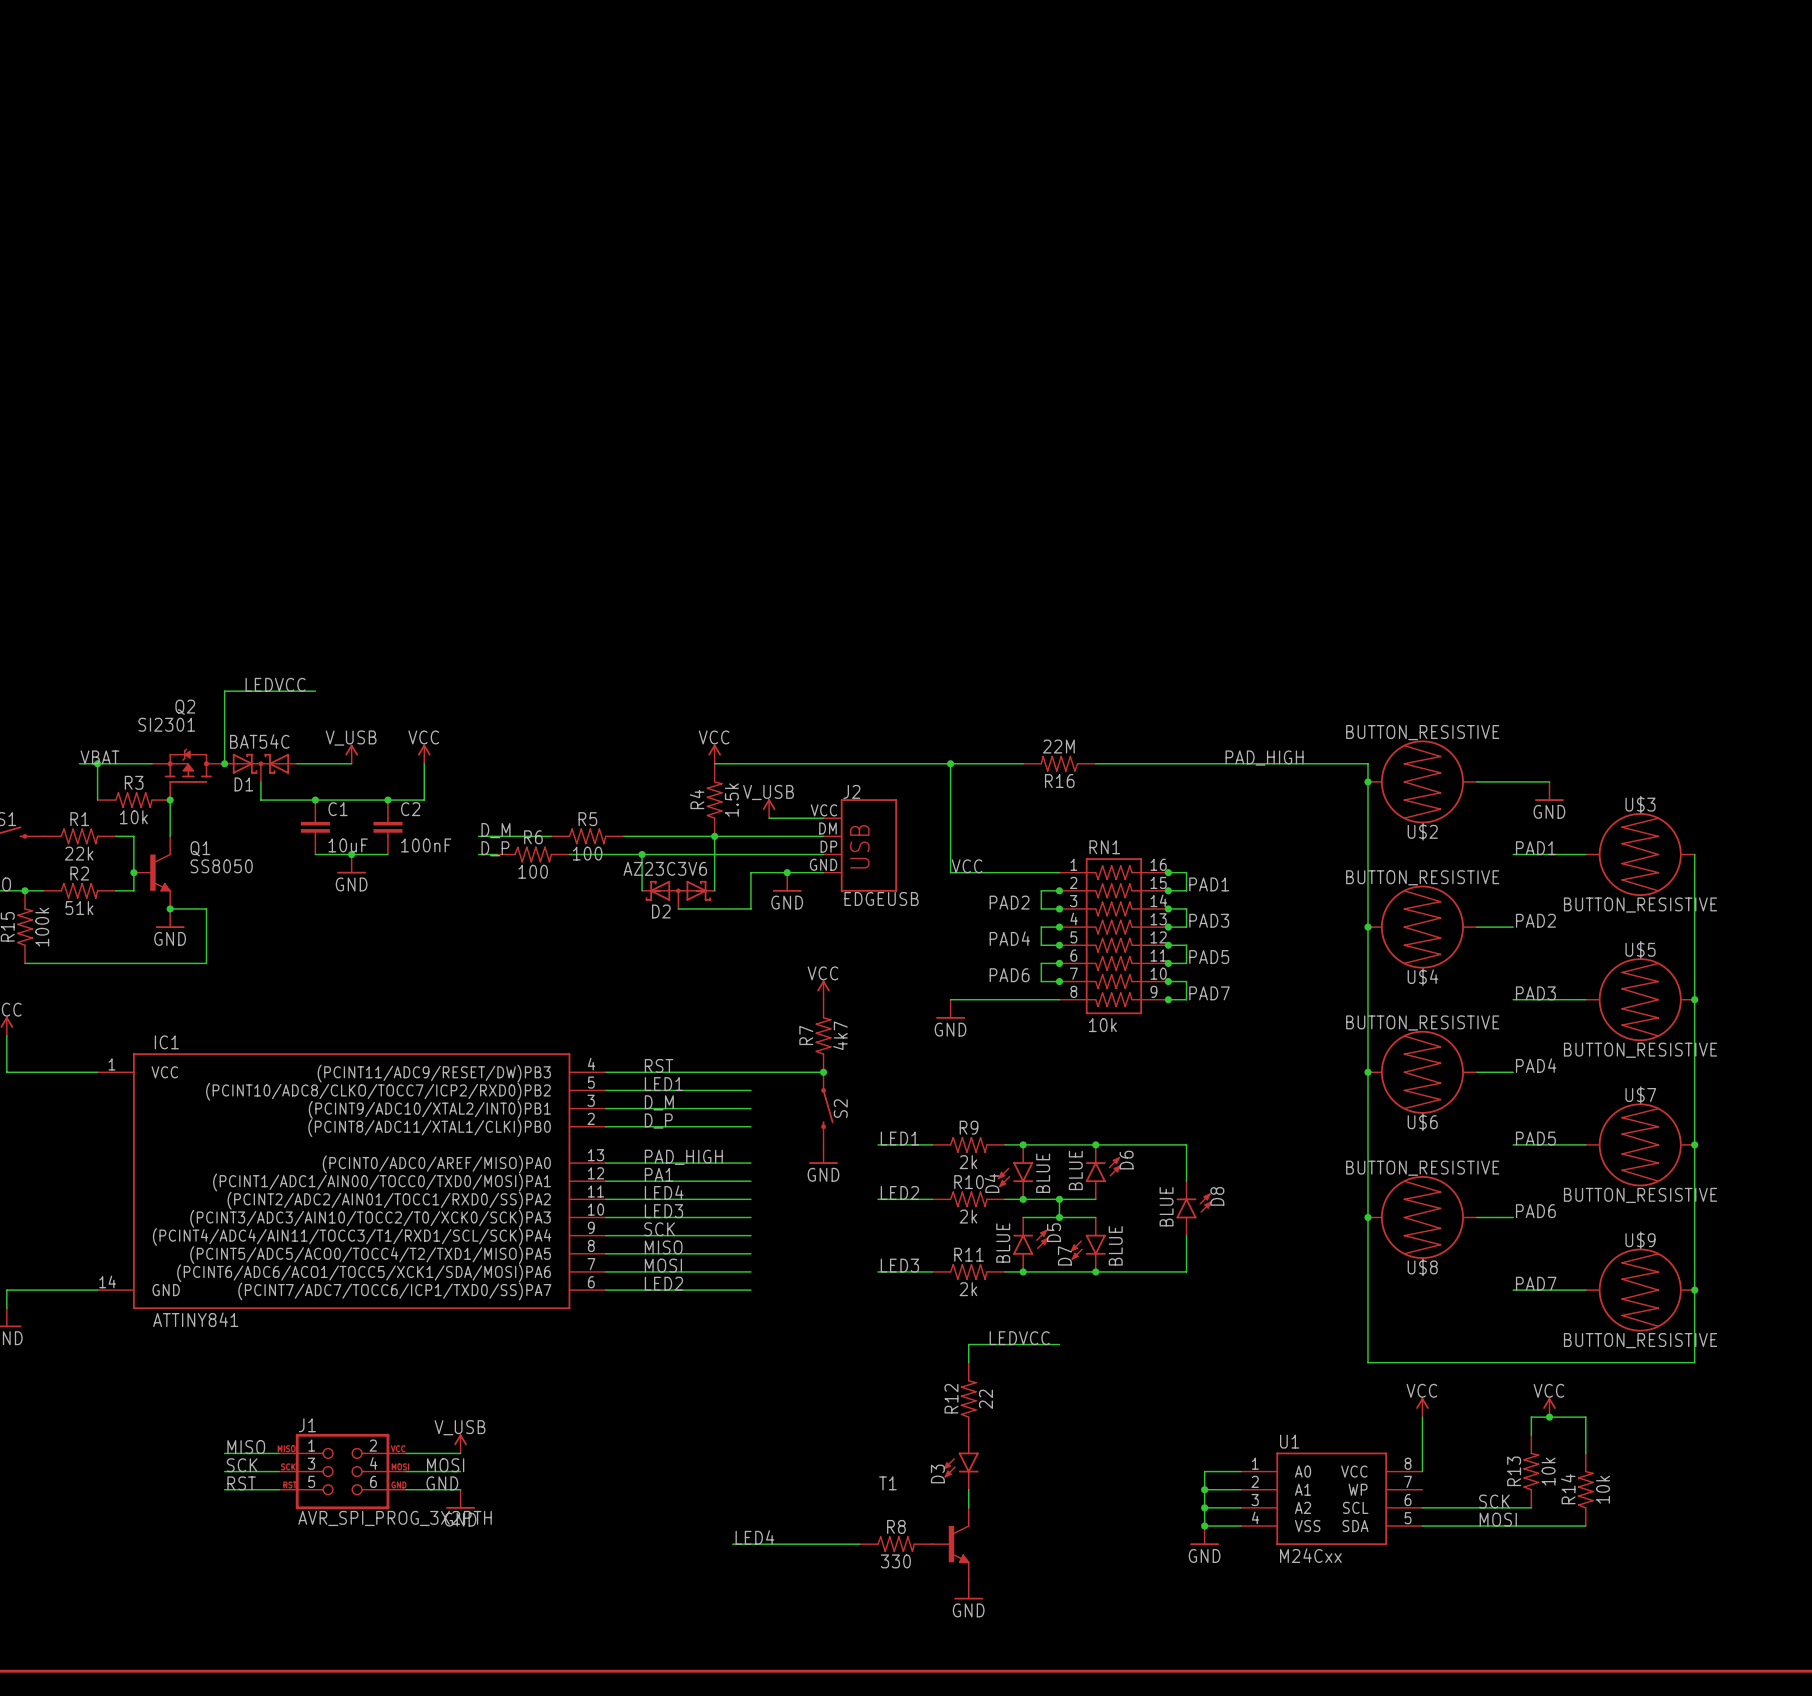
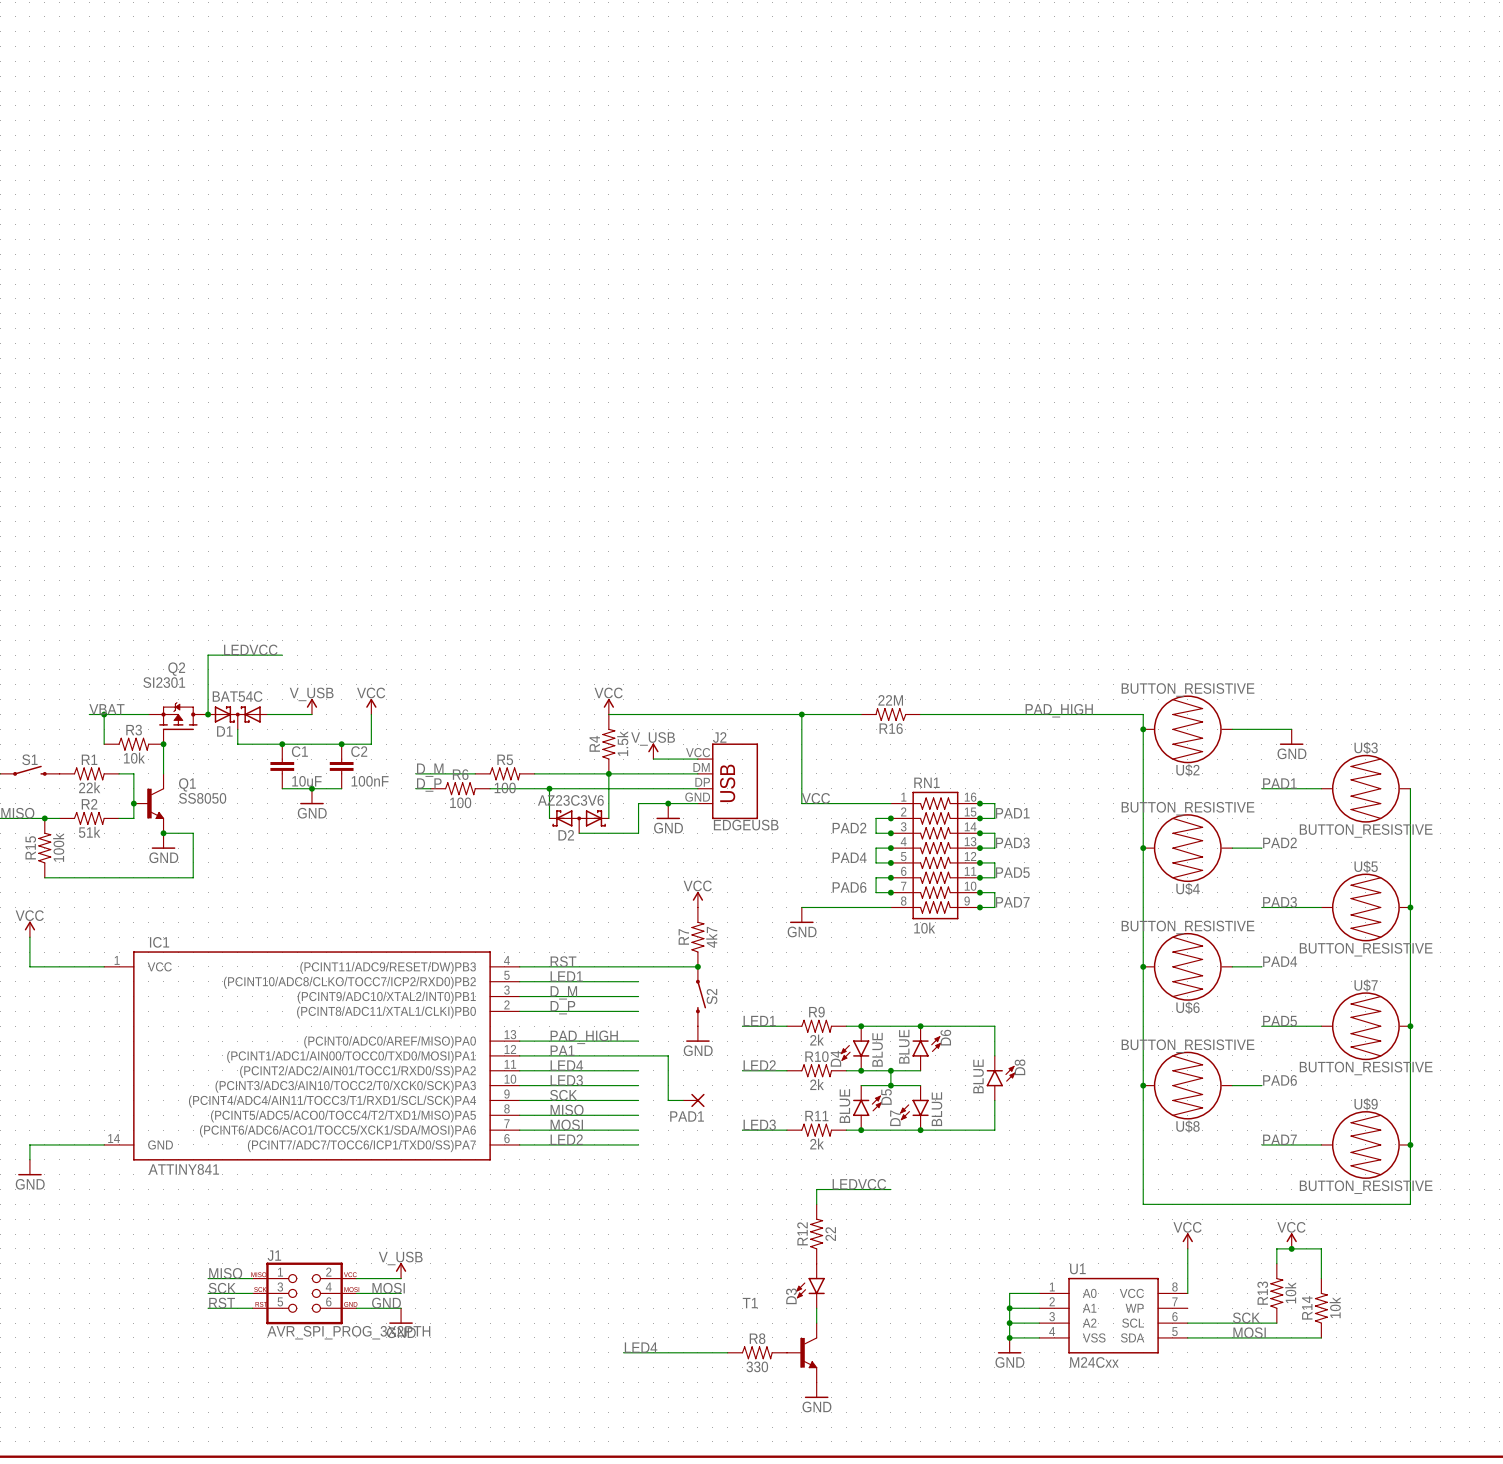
wire: none -> (638, 1055) (668, 1055) (668, 1100) (683, 1100)
PAD1: none -> (693, 1100)

